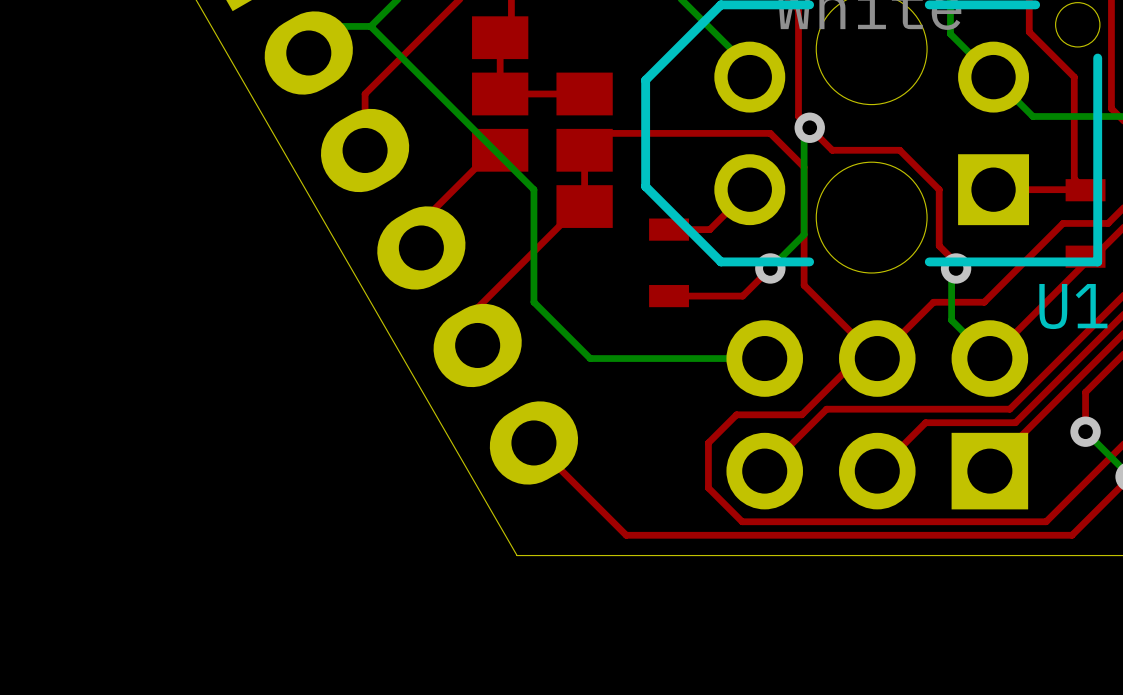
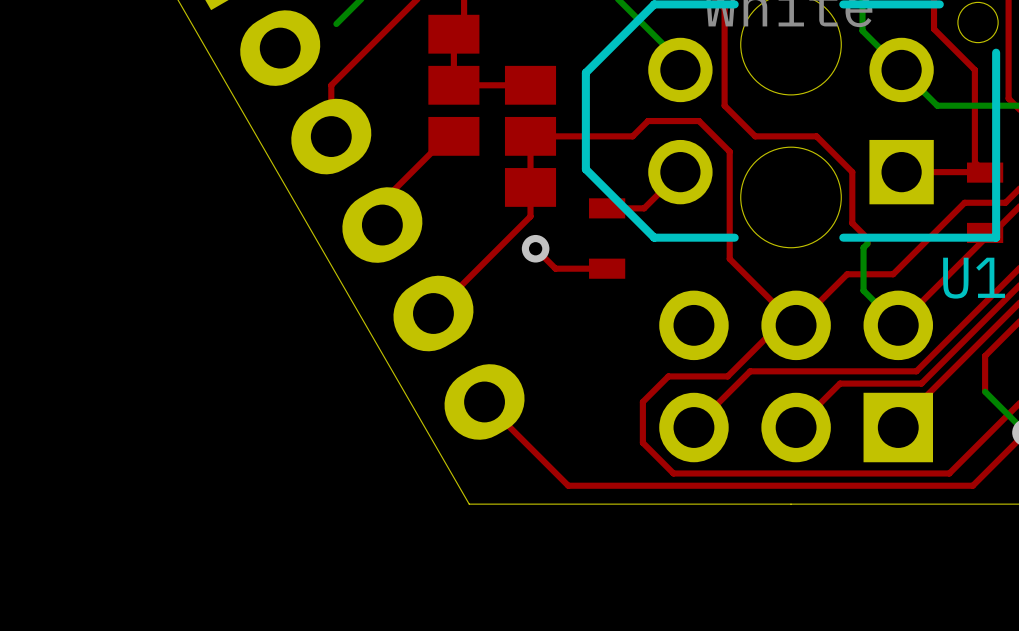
bottom track: (308, 53) (335, 26) (370, 26) (533, 189) (533, 302) (590, 358) (764, 358) -> none
bottom track: (809, 127) (809, 133) (804, 139) (804, 234) (770, 268) -> none
via: (809, 127) -> none
top track: (714, 133) (590, 133) (584, 139) (584, 150) -> (647, 121) (632, 136) (530, 136)
top track: (584, 206) (578, 206) (477, 307) (477, 345) -> (530, 187) (530, 216) (433, 313)
top track: (770, 268) (742, 296) (669, 296) -> (535, 248) (555, 268) (607, 268)
via: (770, 268) -> none
via: (956, 268) -> none
via: none -> (535, 248)
via: (1085, 431) -> none

